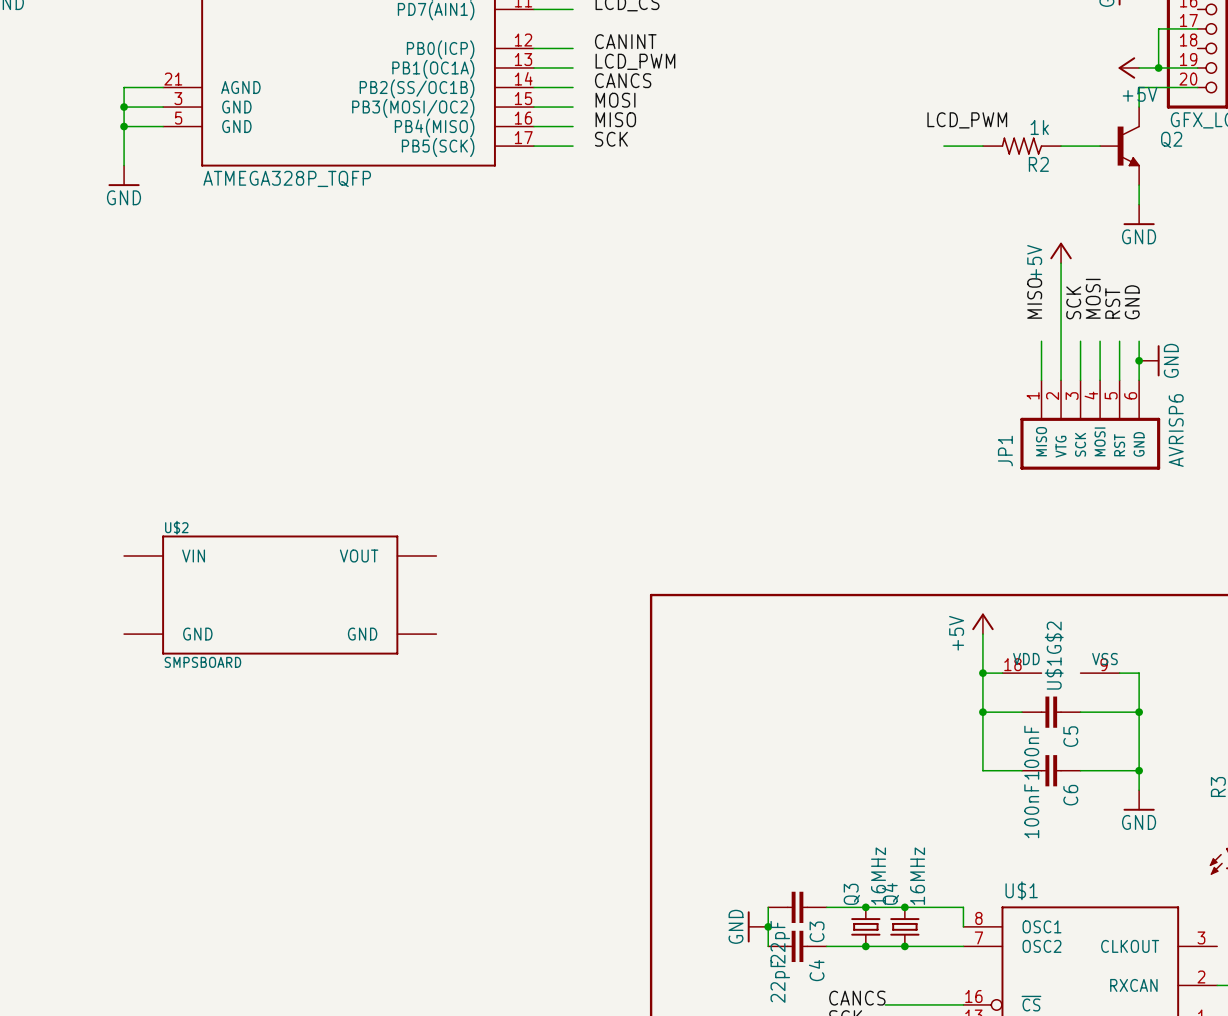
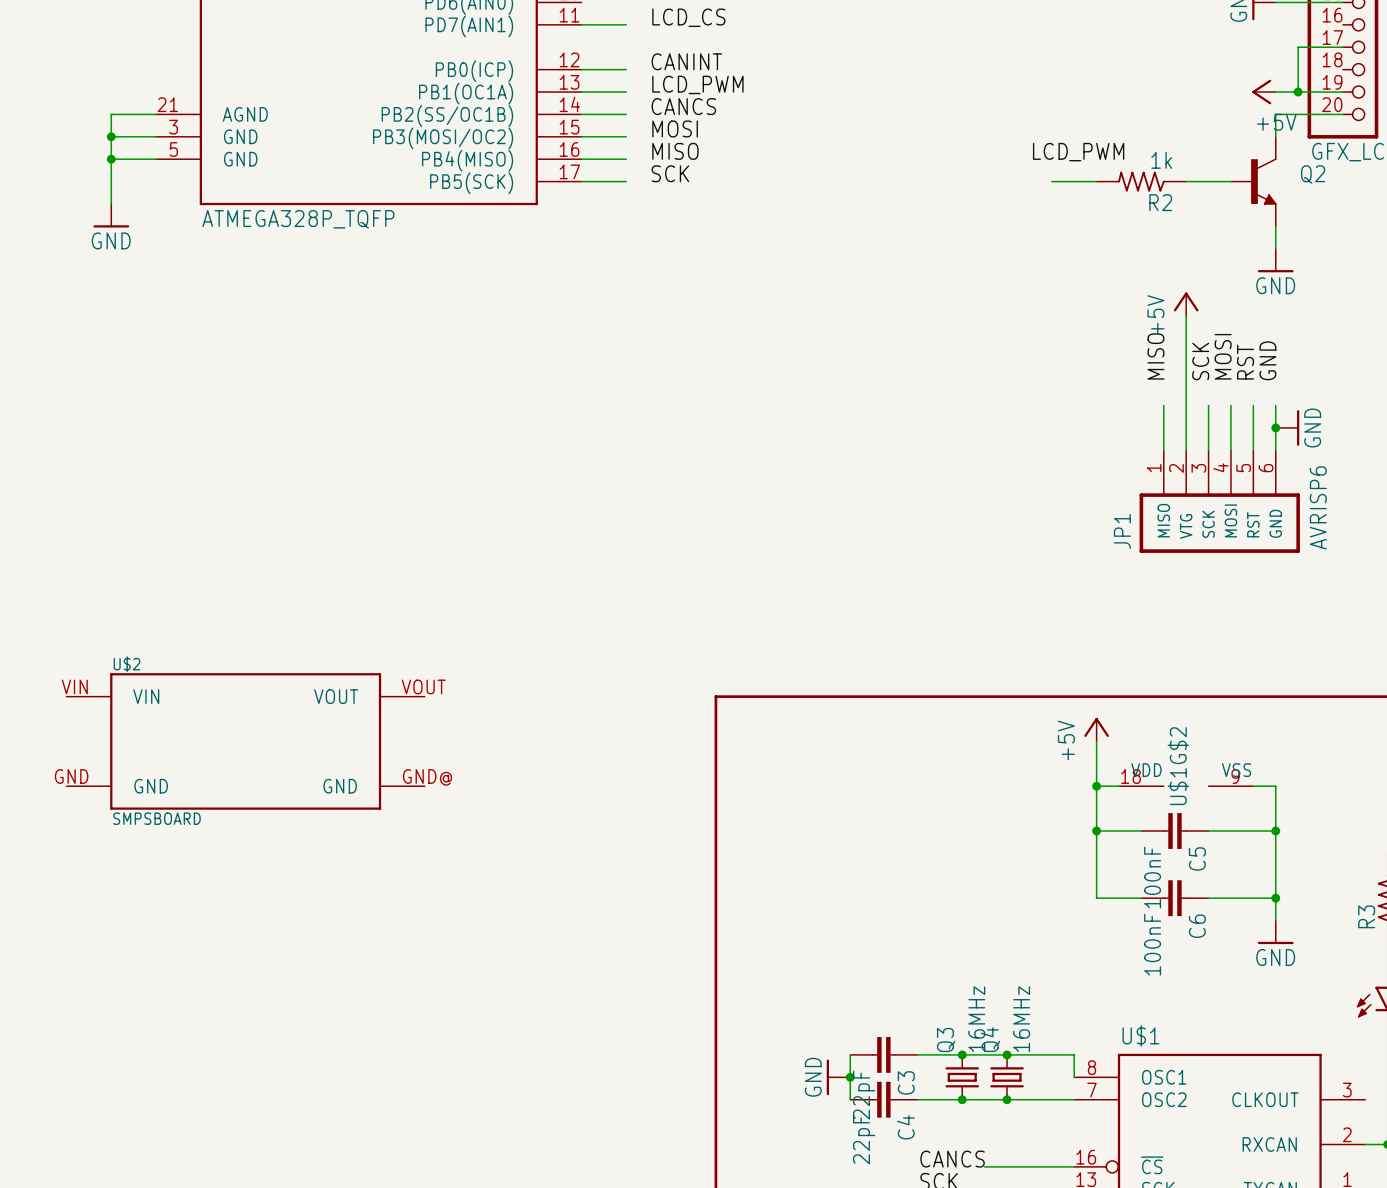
U$2 pin number: none -> VIN (74, 686)
U$2 pin number: none -> VOUT (423, 686)
U$2 position: (280, 595) -> (245, 741)
U$2 pin number: none -> GND (71, 776)
U$2 pin number: none -> GND@ (427, 777)

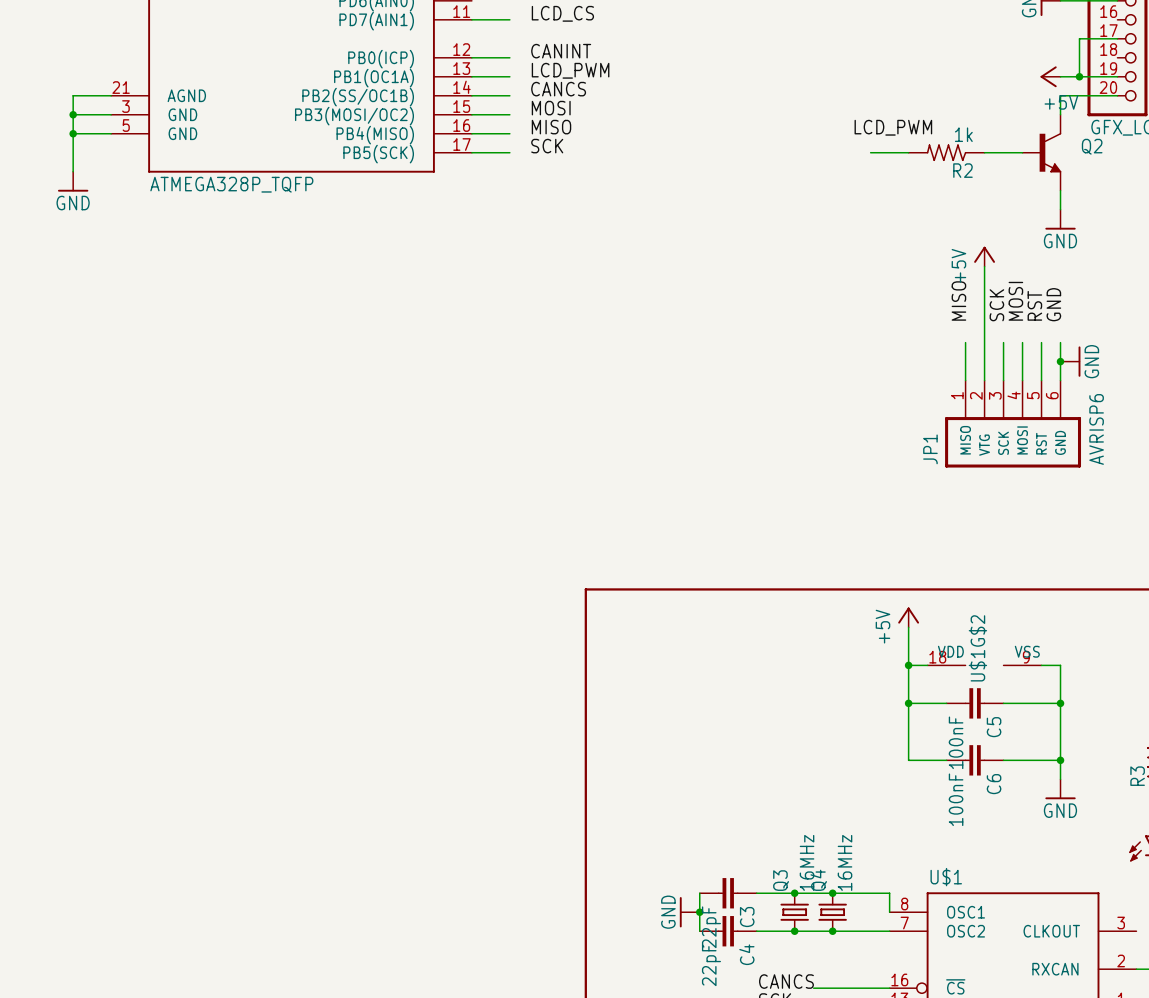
U$2: SMPSBOARD (245, 741) -> none

